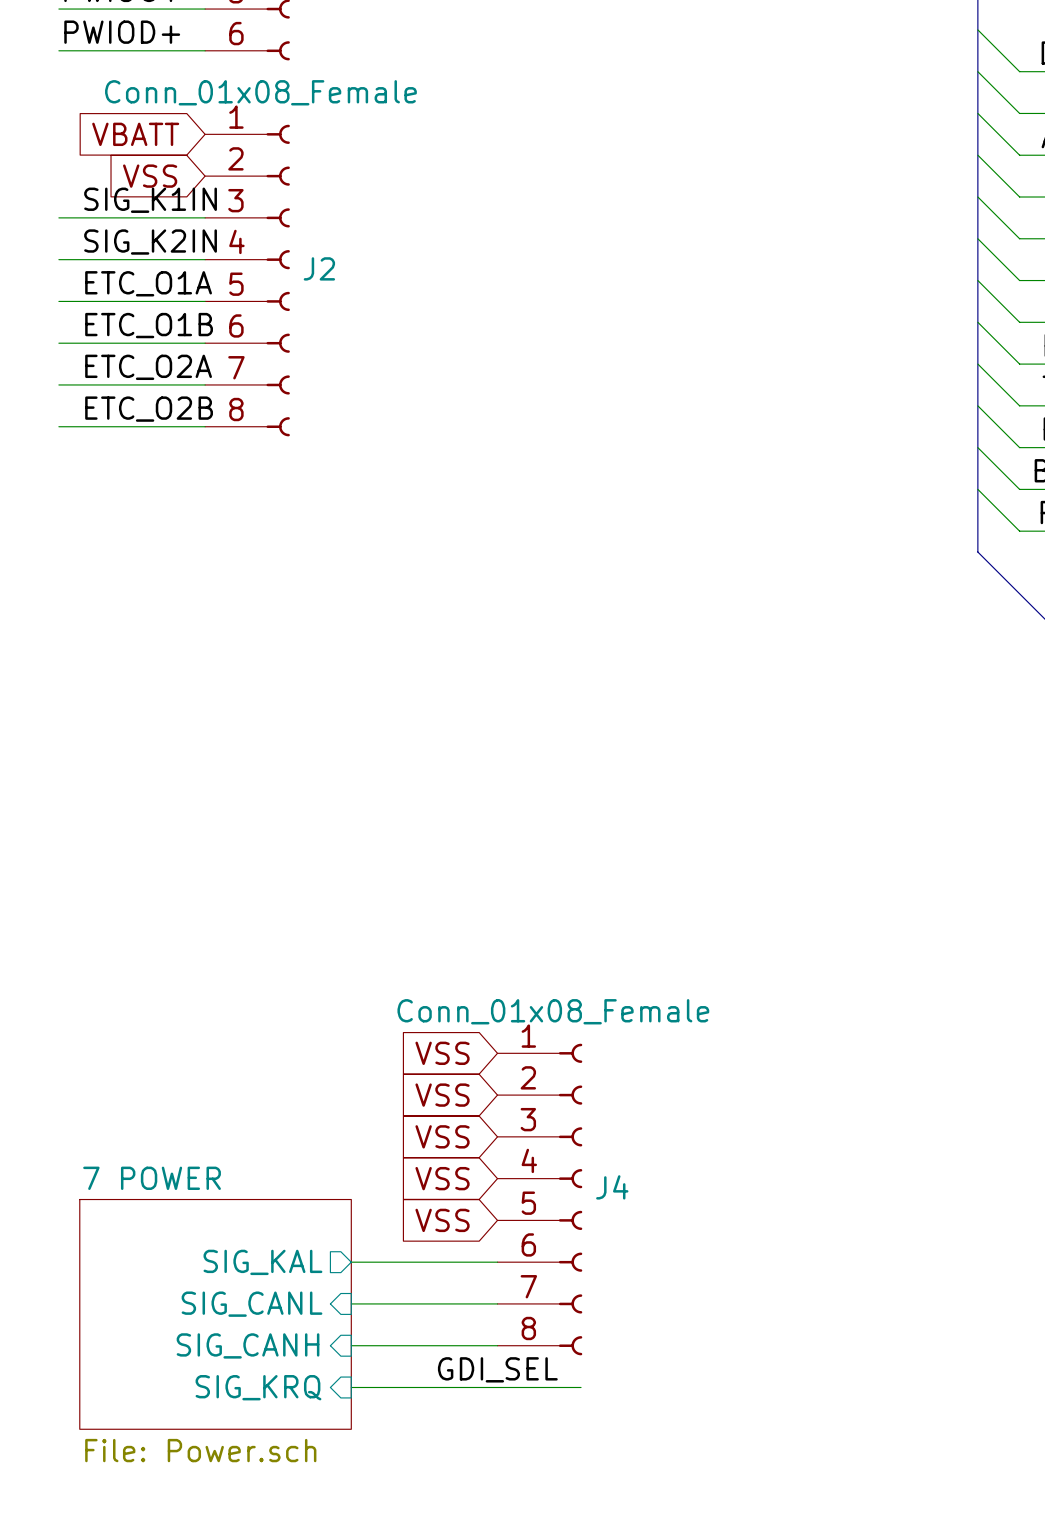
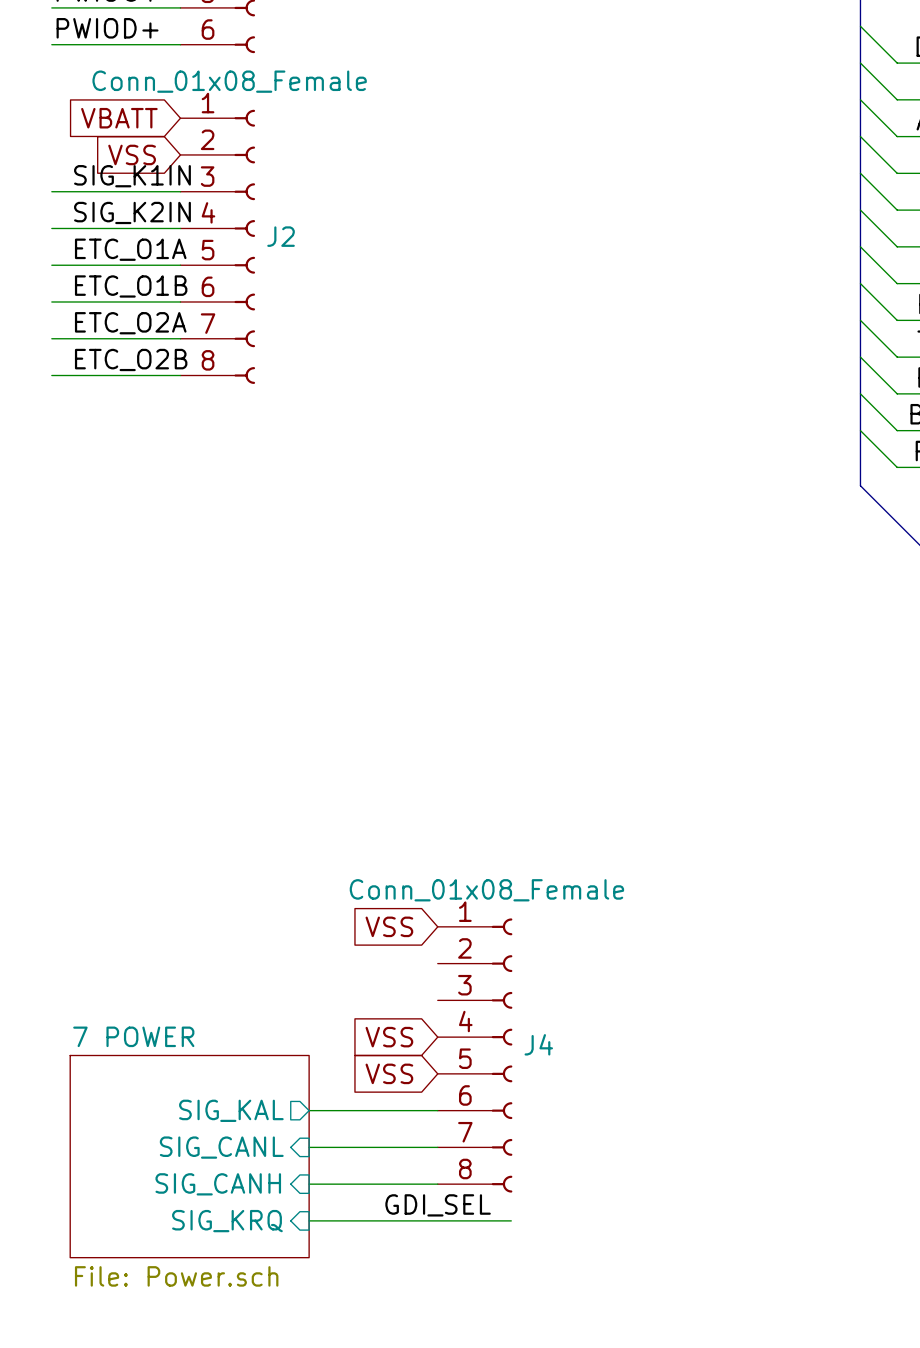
global label: VSS (442, 1095) -> none
global label: VSS (442, 1136) -> none

